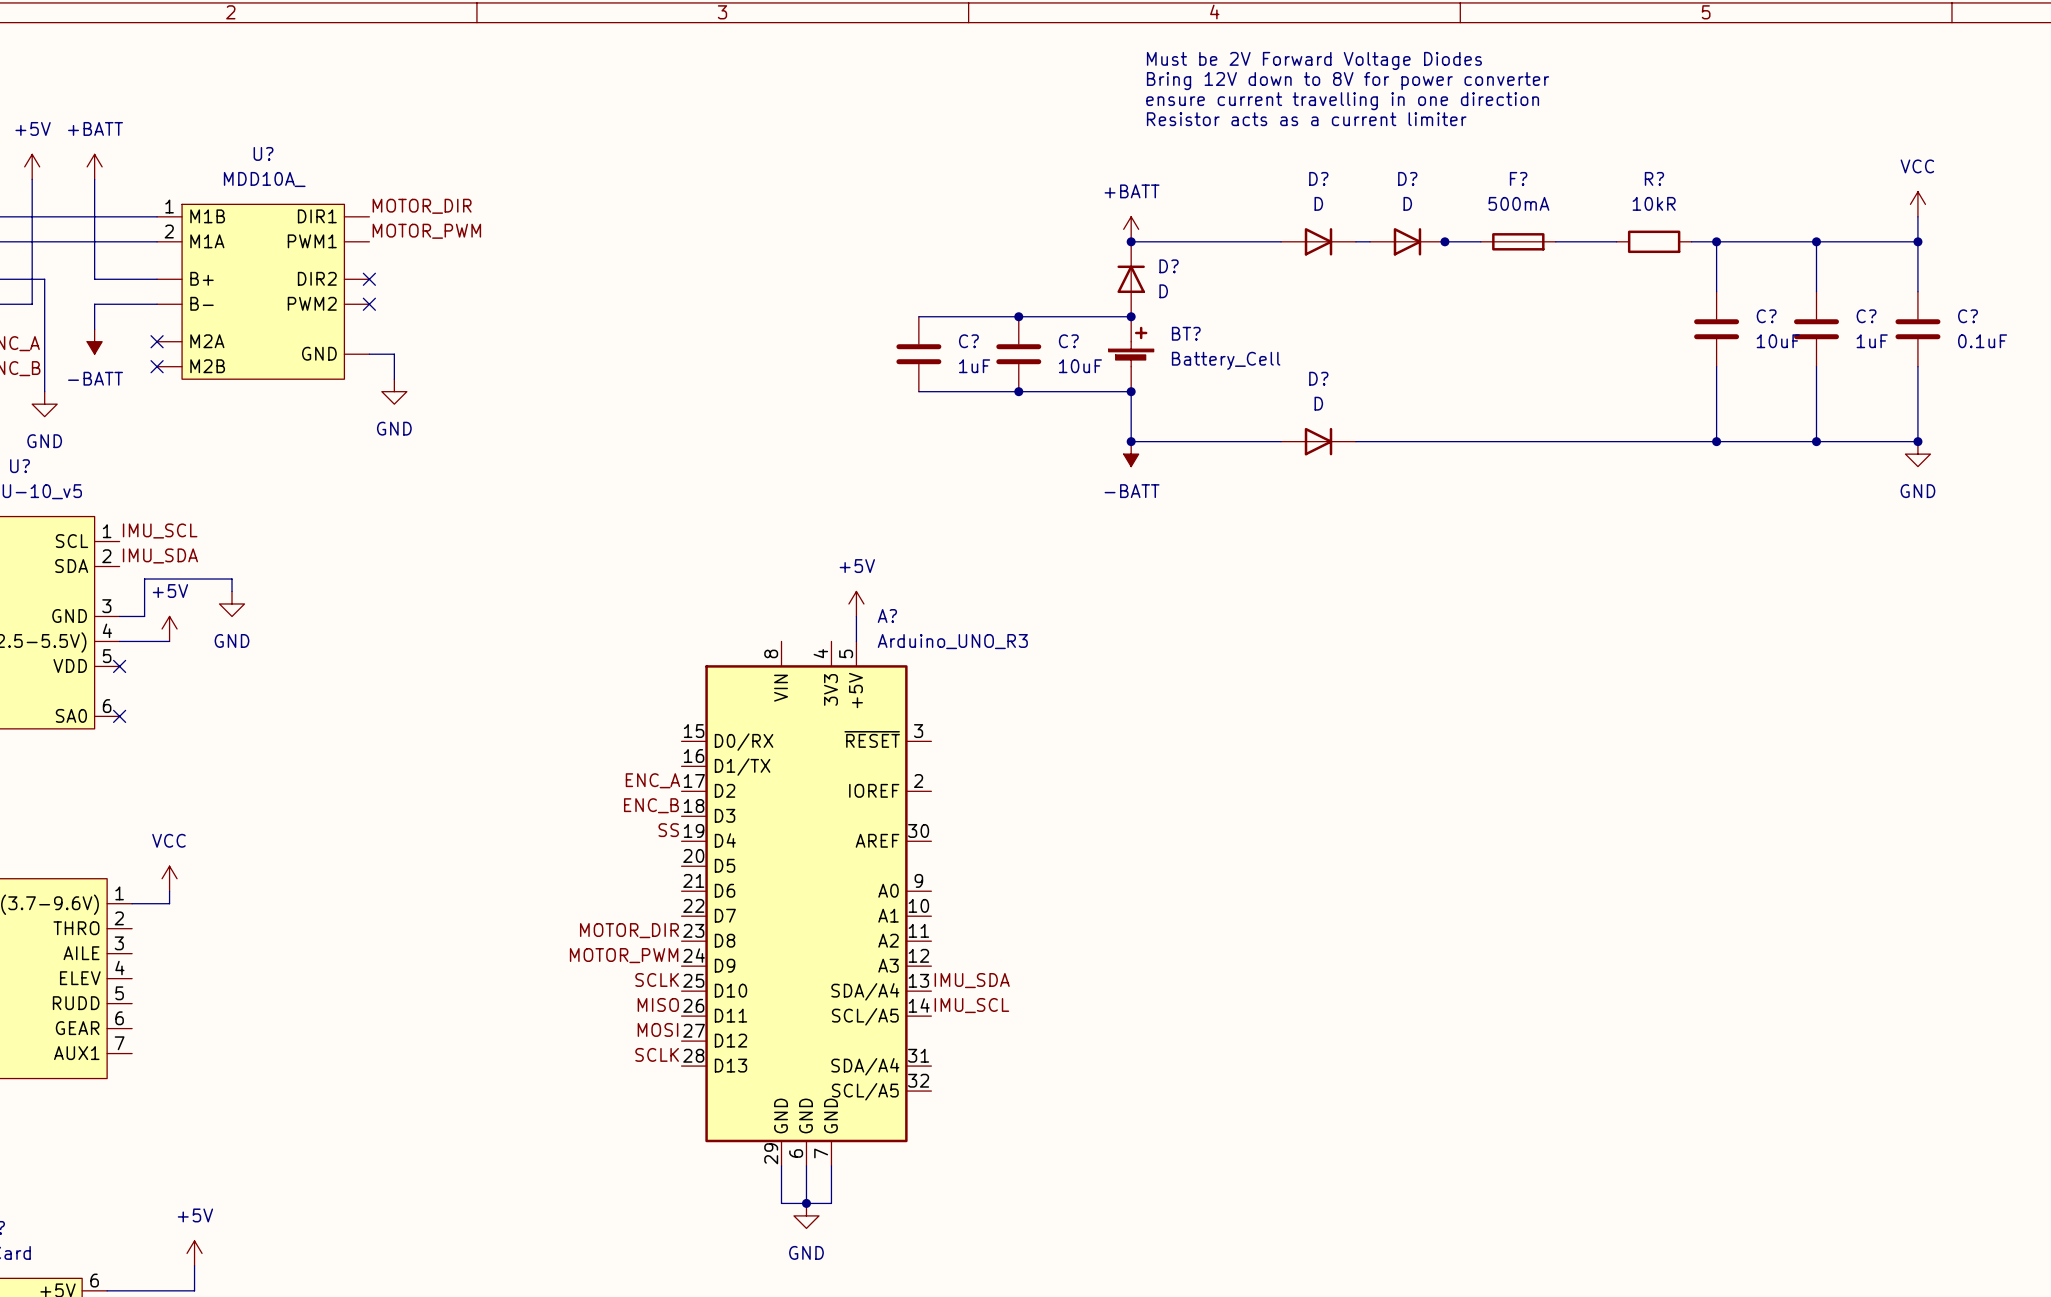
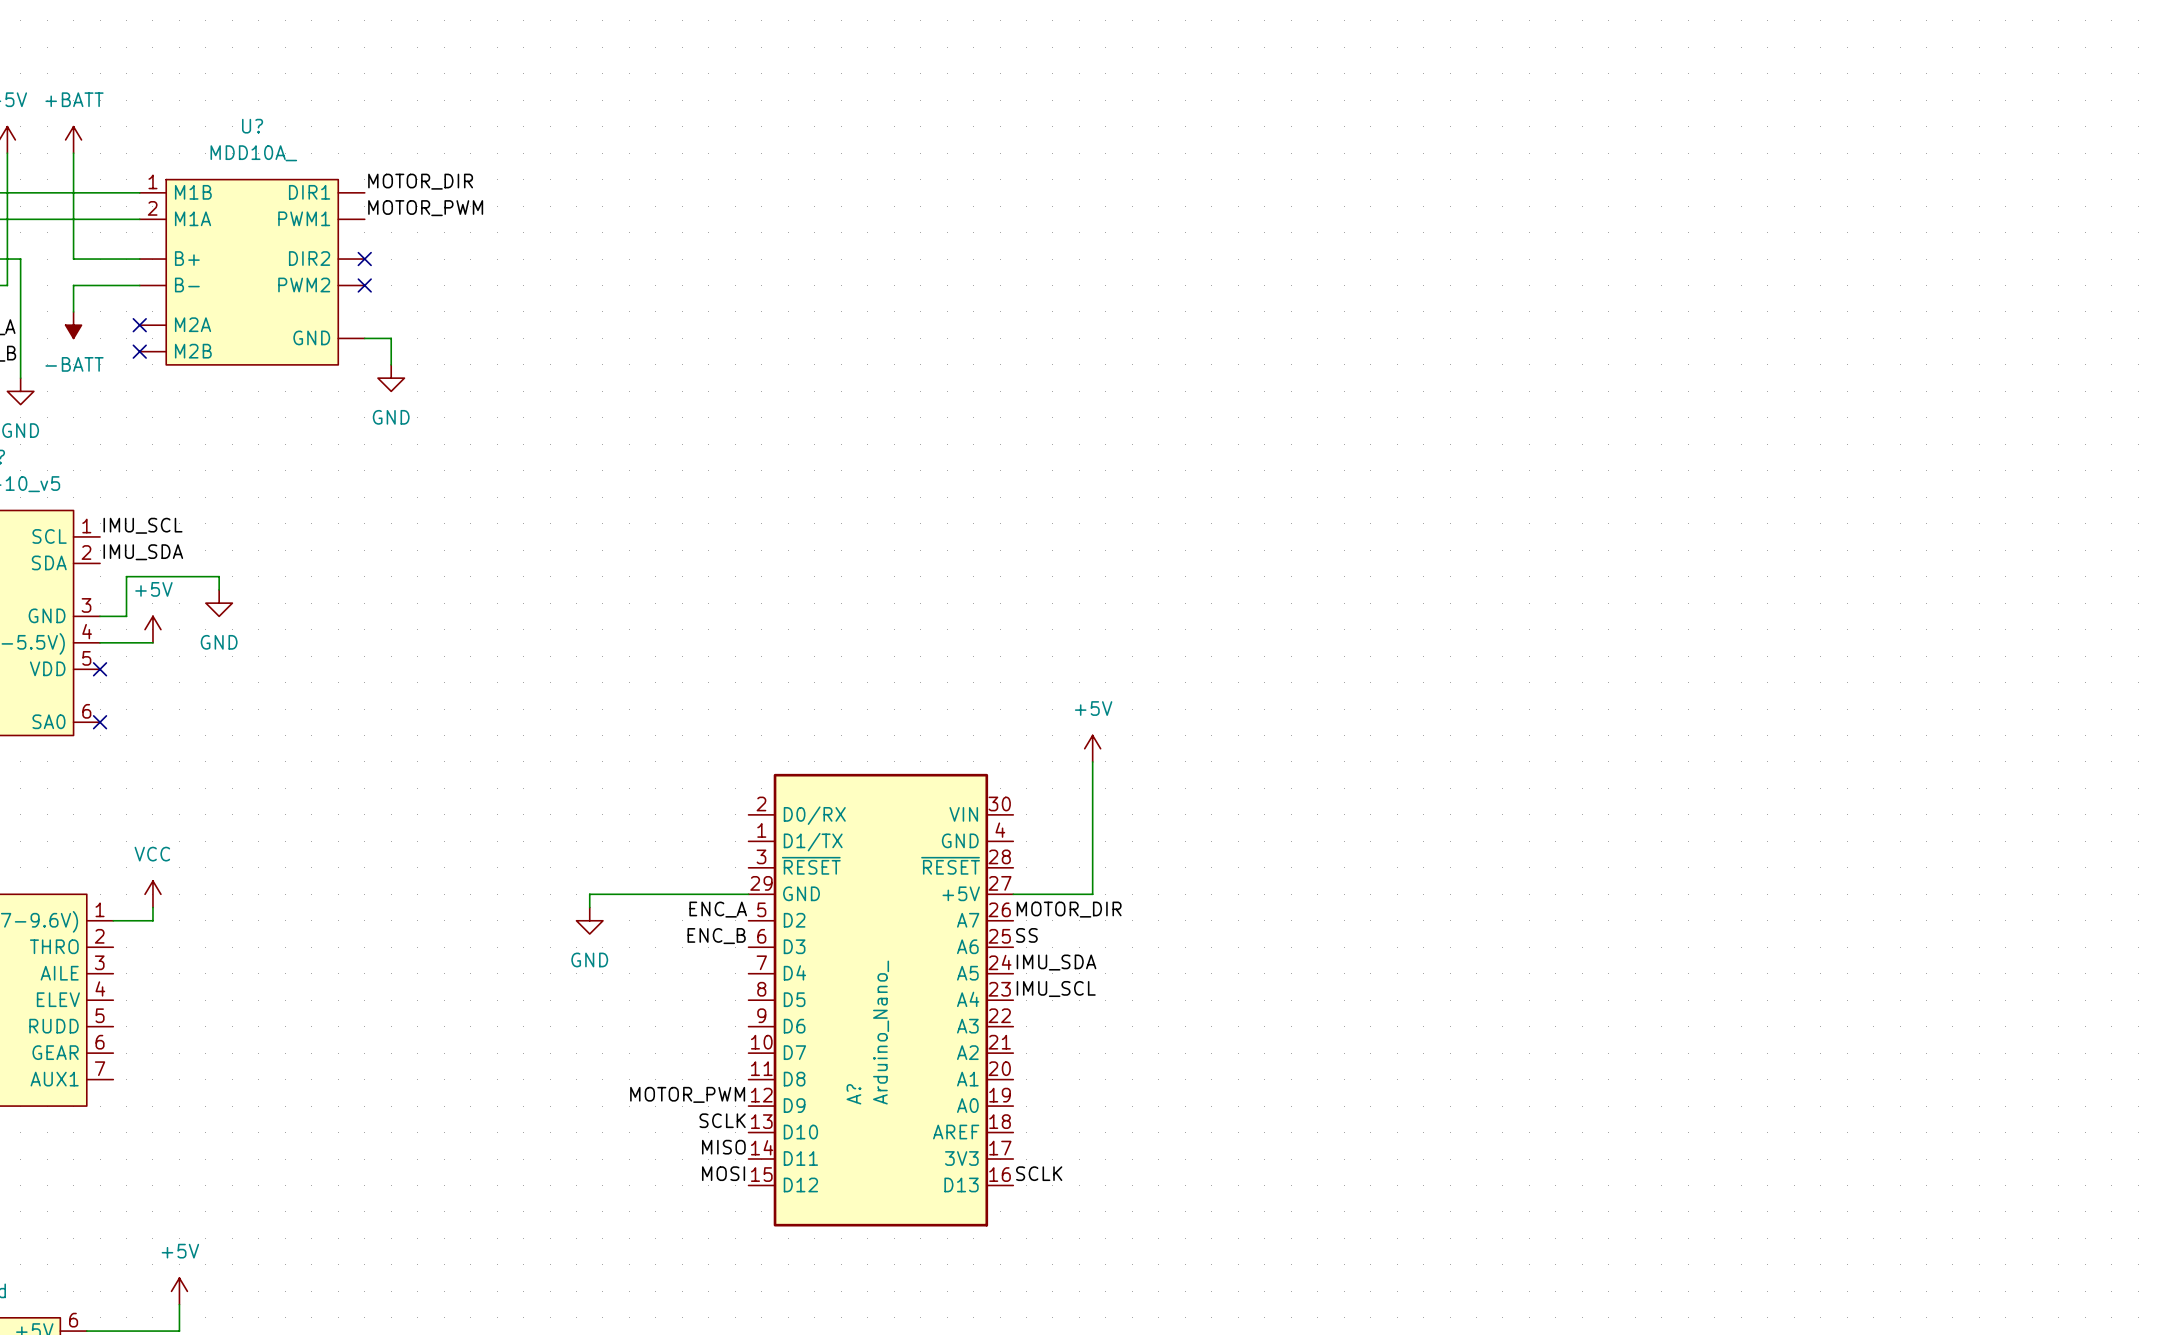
text: Must be 2V Forward Voltage Diodes (1314, 60) -> none
text: Bring 12V down to 8V for power converter (1348, 81) -> none
text: ensure current travelling in one direction (1342, 101) -> none
text: Resistor acts as a current limiter (1306, 119) -> none
power symbol: VCC (1917, 204) -> none
wire: (1917, 216) (1917, 291) -> none
power symbol: +BATT (1131, 229) -> none
wire: (1131, 241) (1281, 241) -> none
junction: (1131, 241) -> none
D?: D (1318, 241) -> none
wire: (1355, 241) (1370, 241) -> none
D?: D (1407, 241) -> none
wire: (1443, 241) (1480, 241) -> none
junction: (1444, 241) -> none
F?: 500mA (1518, 241) -> none
wire: (1555, 241) (1616, 241) -> none
R?: 10kR (1654, 241) -> none
wire: (1691, 241) (1917, 241) -> none
wire: (1716, 241) (1716, 291) -> none
junction: (1716, 241) -> none
wire: (1816, 241) (1816, 291) -> none
junction: (1816, 241) -> none
junction: (1917, 241) -> none
D?: D (1131, 279) -> none
wire: (918, 316) (1131, 316) -> none
junction: (1018, 316) -> none
junction: (1131, 316) -> none
C?: 10uF (1716, 329) -> none
C?: 1uF (1816, 329) -> none
C?: 0.1uF (1917, 329) -> none
C?: 1uF (918, 354) -> none
C?: 10uF (1018, 354) -> none
BT?: Battery_Cell (1131, 354) -> none
wire: (1716, 366) (1716, 441) -> none
wire: (1816, 366) (1816, 441) -> none
wire: (1917, 366) (1917, 441) (1355, 441) -> none
wire: (918, 391) (1131, 391) (1131, 441) (1281, 441) -> none
junction: (1018, 391) -> none
junction: (1131, 391) -> none
junction: (1131, 441) -> none
D?: D (1318, 441) -> none
junction: (1716, 441) -> none
junction: (1816, 441) -> none
junction: (1917, 441) -> none
power symbol: -BATT (1131, 454) -> none
power symbol: GND (1917, 454) -> none
power symbol position: +5V (856, 603) -> +5V (1092, 748)
wire: (856, 616) (856, 641) -> none
wire: none -> (1092, 761) (1092, 894) (1013, 894)
label position: ENC_A (652, 780) -> ENC_A (718, 909)
label position: ENC_B (651, 805) -> ENC_B (716, 936)
label: SS (668, 830) -> none
wire: none -> (748, 894) (589, 894) (589, 907)
label: none -> MOTOR_DIR (1069, 909)
power symbol: none -> GND (589, 920)
A?: Arduino_UNO_R3 (806, 903) -> none
label: none -> SS (1026, 935)
label: MOTOR_DIR (629, 930) -> none
label position: MOTOR_PWM (624, 955) -> MOTOR_PWM (687, 1094)
A?: none -> Arduino_Nano_ (880, 1000)
label: SCLK (657, 979) -> none
label position: IMU_SDA (972, 980) -> IMU_SDA (1056, 962)
label position: MISO (658, 1004) -> MISO (723, 1147)
label position: IMU_SCL (971, 1005) -> IMU_SCL (1056, 989)
label position: MOSI (658, 1029) -> MOSI (723, 1173)
label: SCLK (657, 1054) -> none
label: none -> SCLK (722, 1120)
label: none -> SCLK (1039, 1173)
wire: (781, 1165) (781, 1203) (831, 1203) (831, 1165) -> none
junction: (806, 1203) -> none
power symbol: GND (806, 1215) -> none

